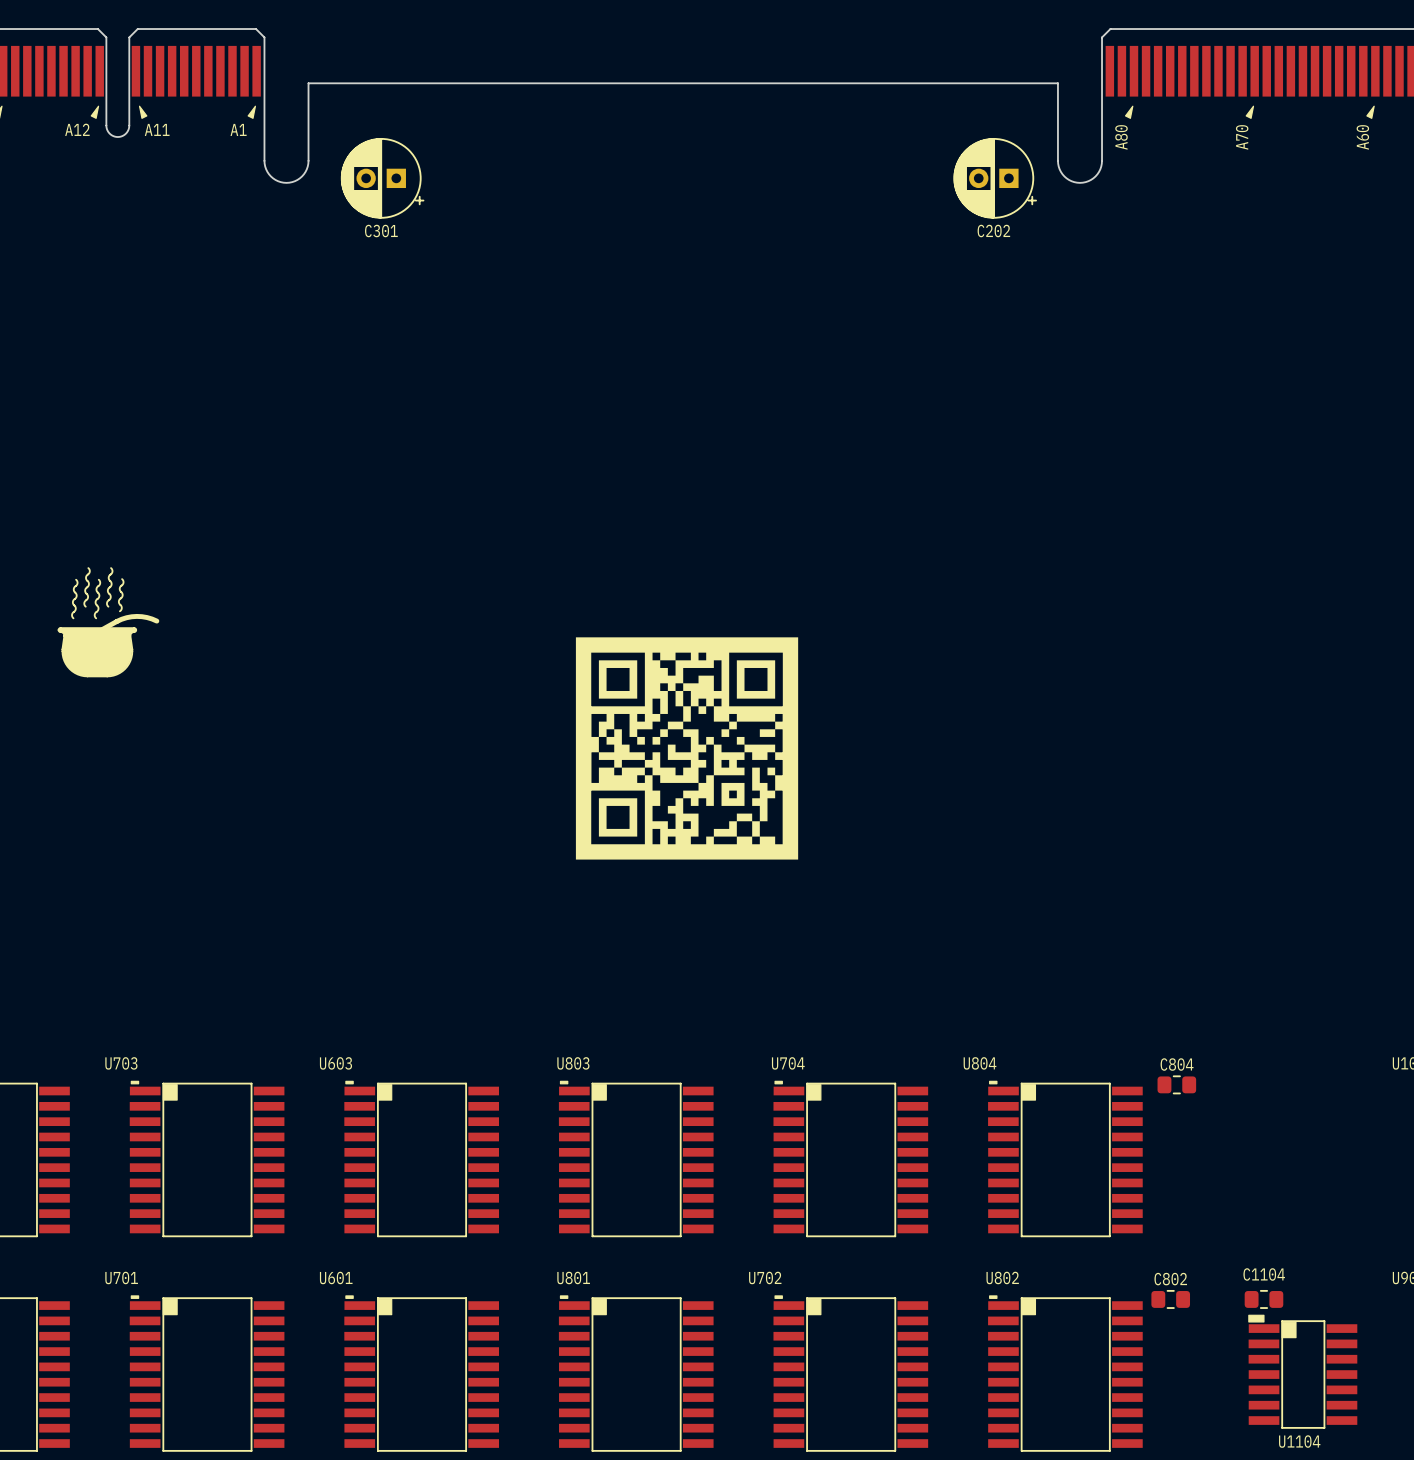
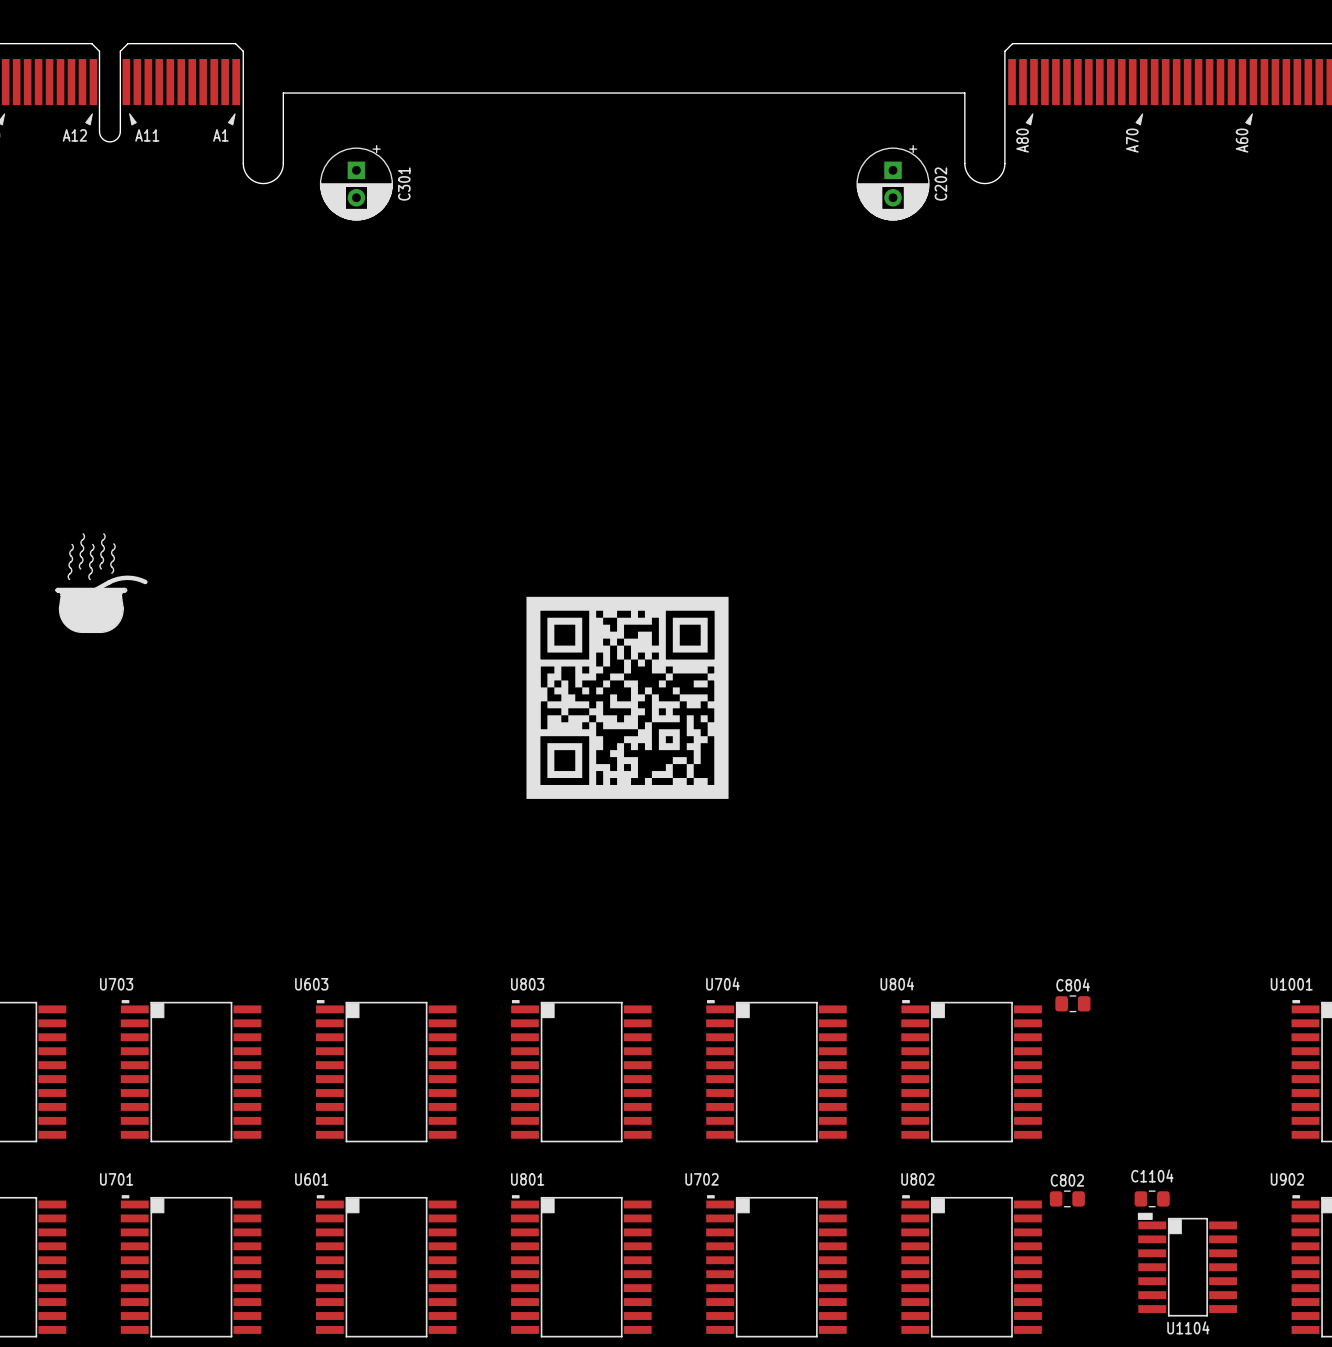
C301 rotation: 0° (382, 178) -> 90° counterclockwise (356, 182)
C202 rotation: 0° (995, 178) -> 90° counterclockwise (893, 182)

